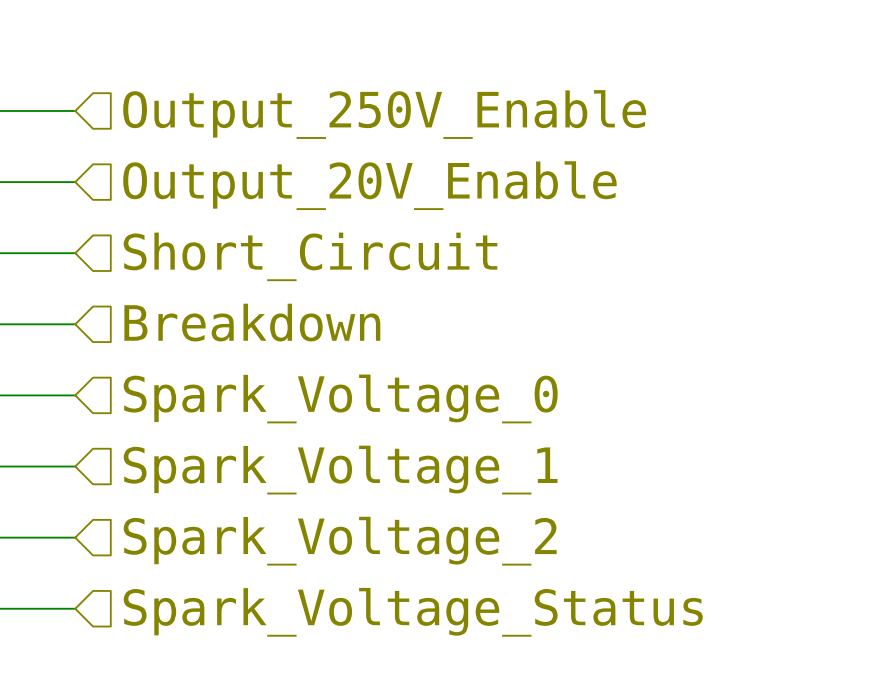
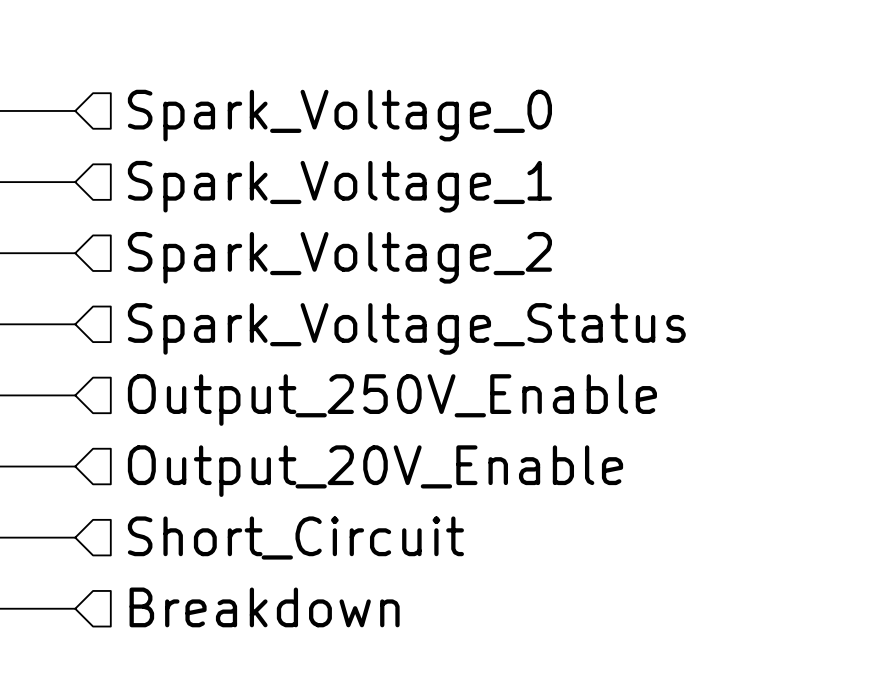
hierarchical label: Output_250V_Enable (384, 114) -> Spark_Voltage_0 (339, 115)
hierarchical label: Output_20V_Enable (369, 185) -> Spark_Voltage_1 (339, 186)
hierarchical label: Short_Circuit (310, 256) -> Spark_Voltage_2 (339, 257)
hierarchical label: Breakdown (252, 322) -> Spark_Voltage_Status (406, 328)
hierarchical label: Spark_Voltage_0 (340, 398) -> Output_250V_Enable (392, 400)
hierarchical label: Spark_Voltage_1 (340, 470) -> Output_20V_Enable (375, 471)
hierarchical label: Spark_Voltage_2 (340, 541) -> Short_Circuit (295, 538)
hierarchical label: Spark_Voltage_Status (413, 612) -> Breakdown (264, 607)

